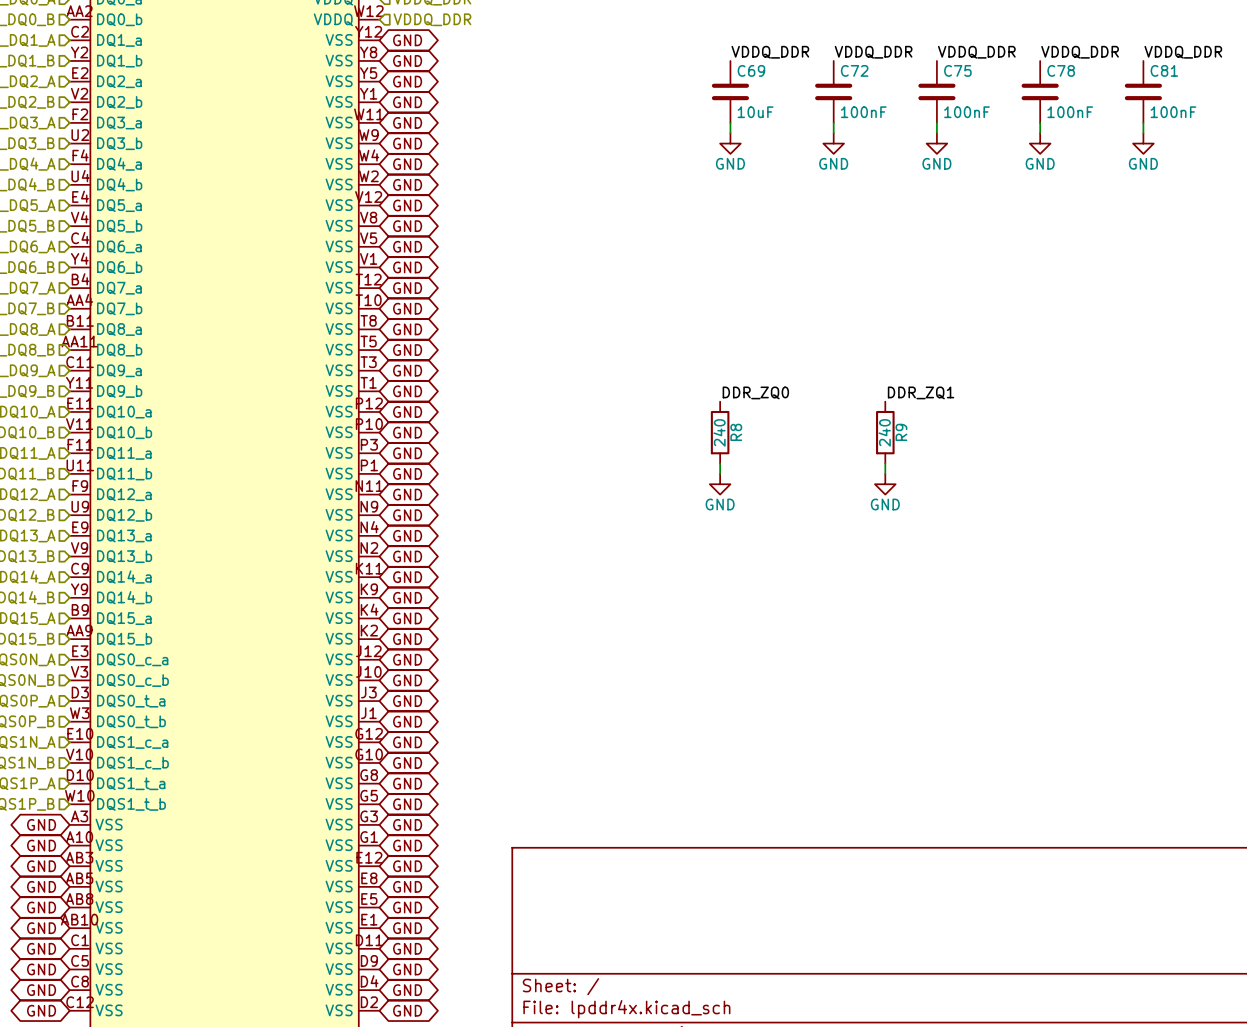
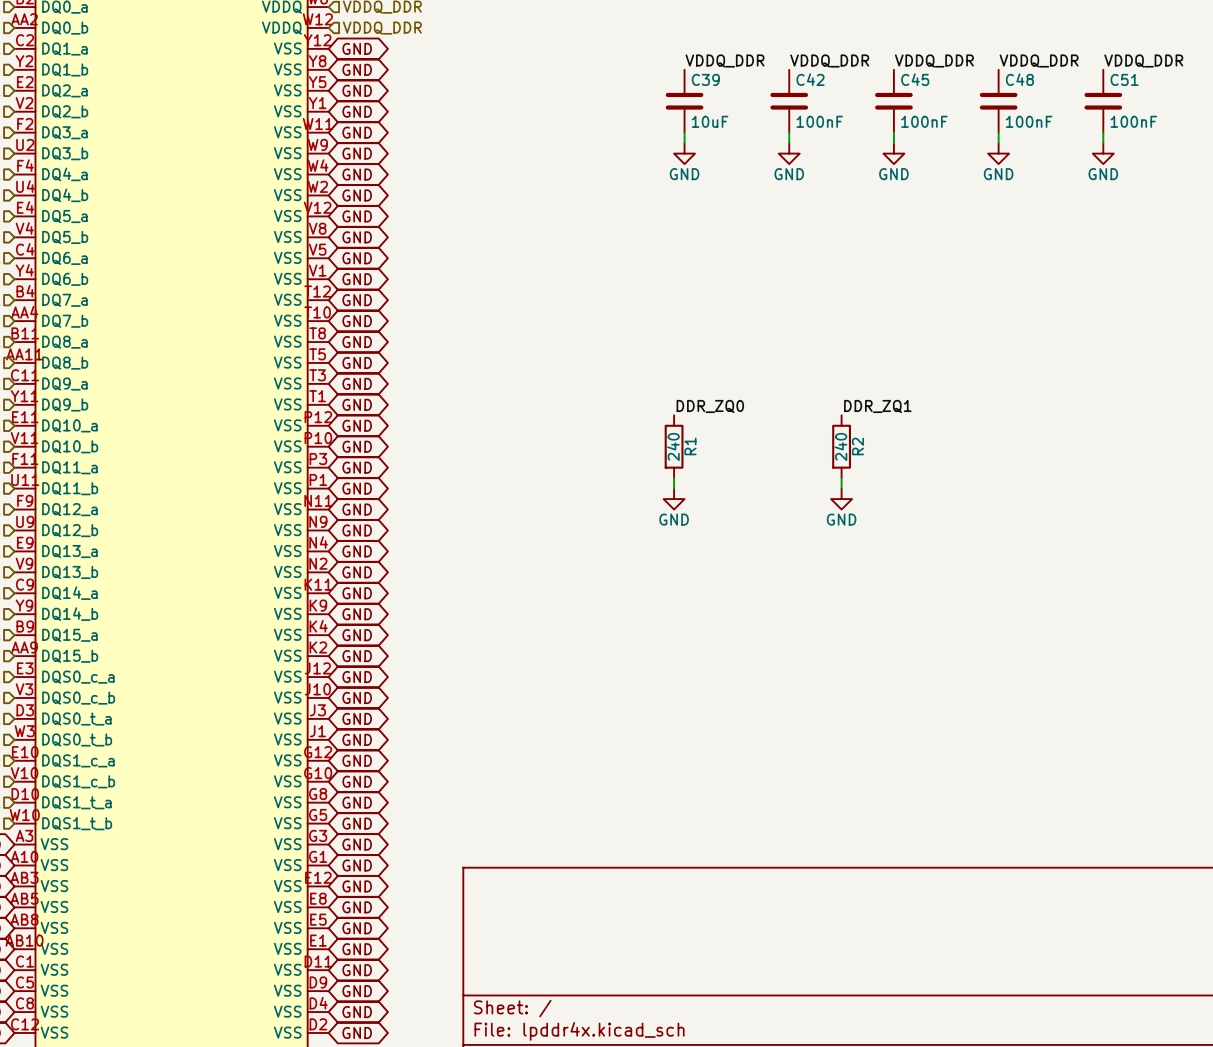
C69 name: C69 (751, 70) -> C39 (705, 79)
C72 name: C72 (854, 70) -> C42 (810, 79)
C75 name: C75 (957, 70) -> C45 (915, 79)
C78 name: C78 (1061, 70) -> C48 (1019, 79)
C81 name: C81 (1164, 70) -> C51 (1124, 79)
R8 name: R8 (736, 432) -> R1 (690, 446)
R9 name: R9 (901, 432) -> R2 (857, 446)

